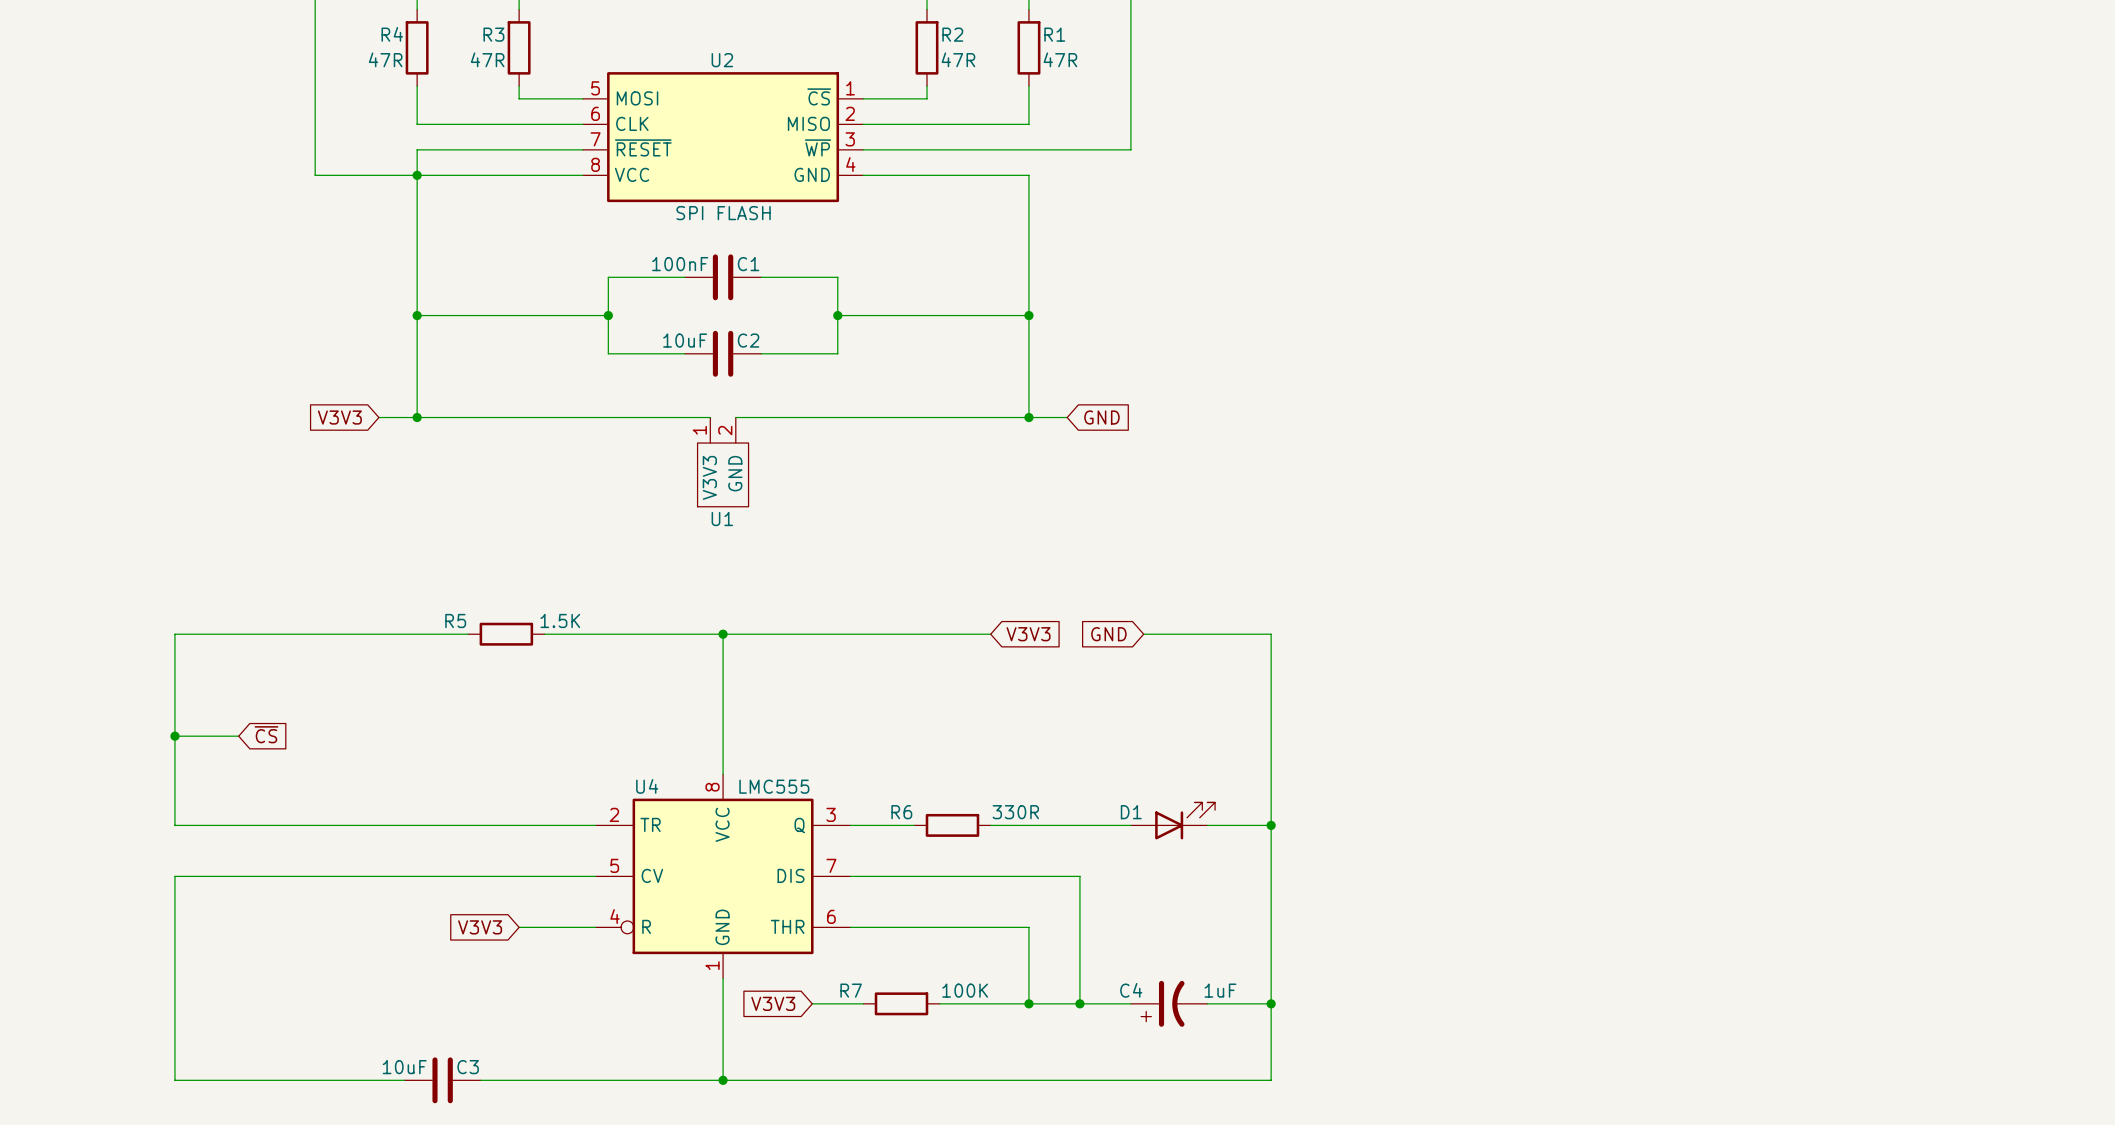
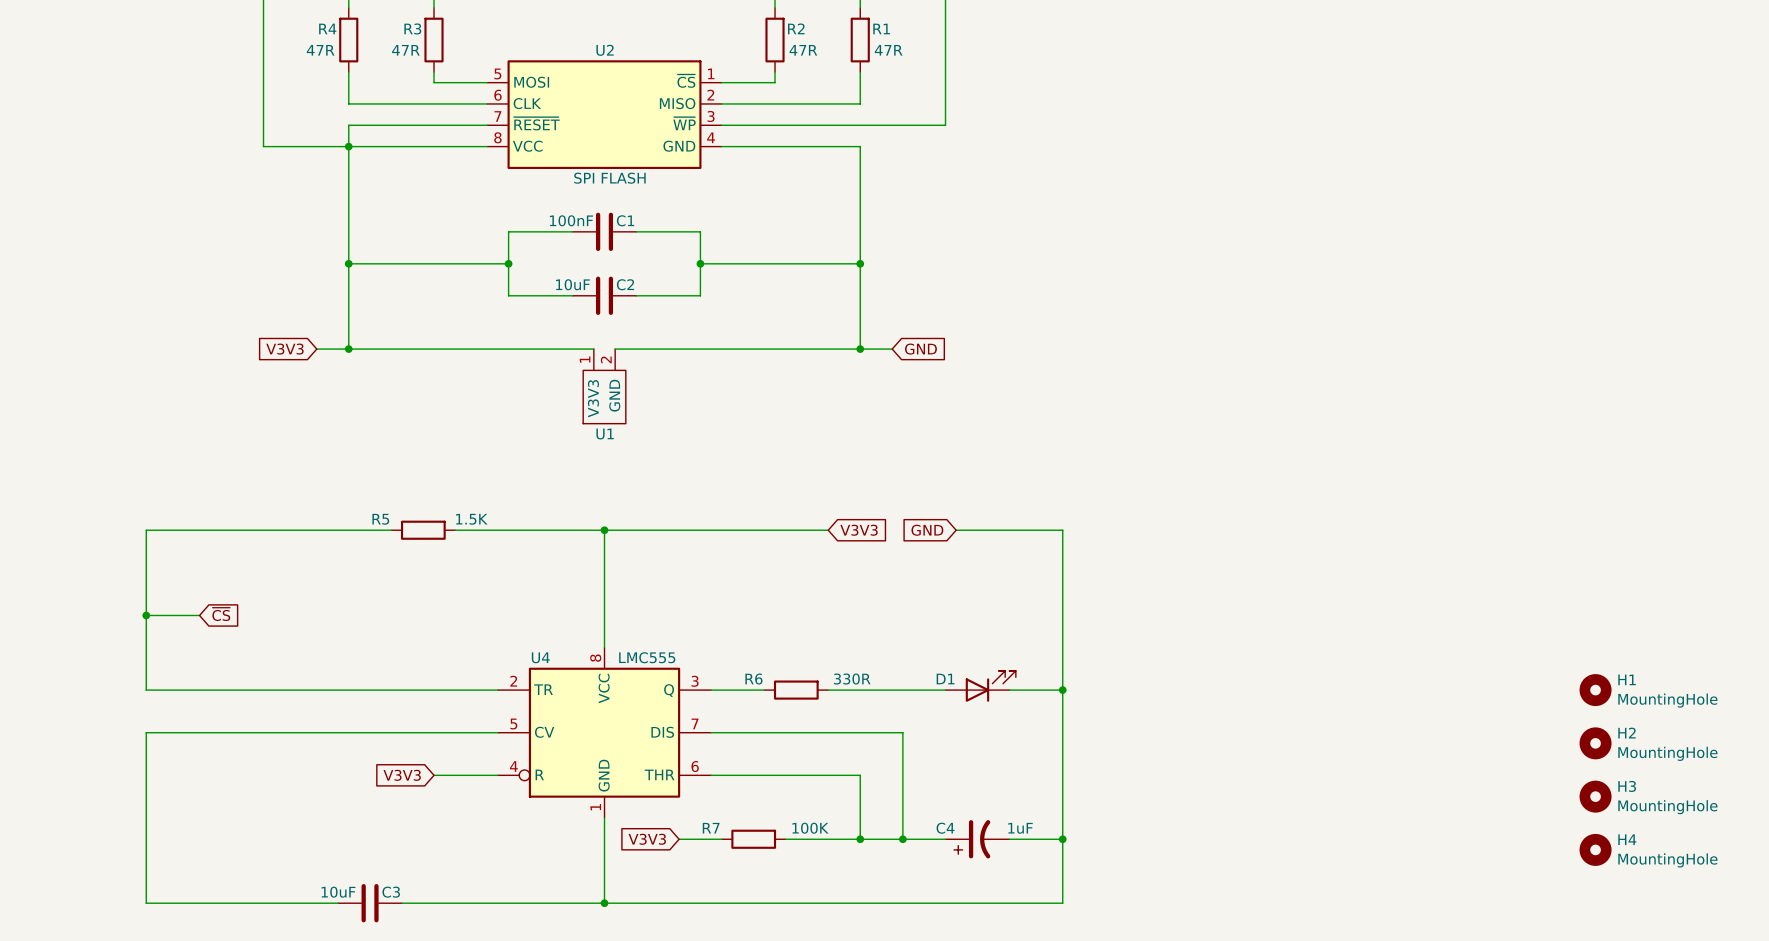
H1: none -> MountingHole (1595, 690)
H2: none -> MountingHole (1595, 743)
H3: none -> MountingHole (1595, 796)
H4: none -> MountingHole (1595, 849)

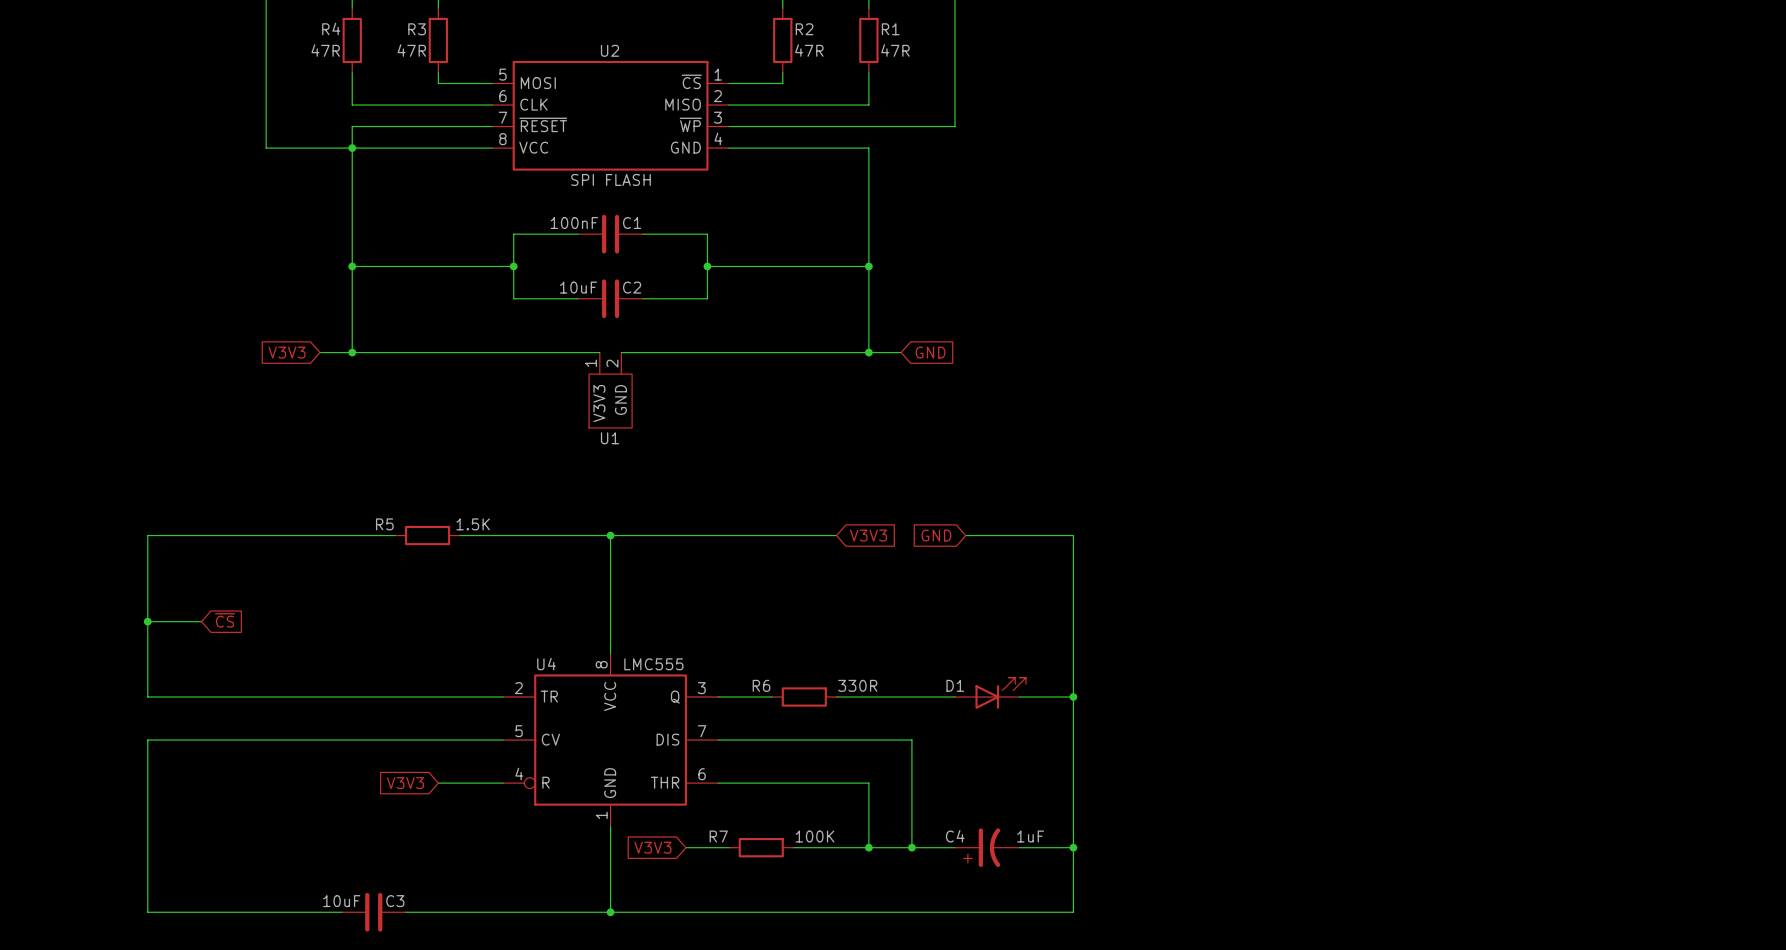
H1: MountingHole (1595, 690) -> none
H2: MountingHole (1595, 743) -> none
H3: MountingHole (1595, 796) -> none
H4: MountingHole (1595, 849) -> none

